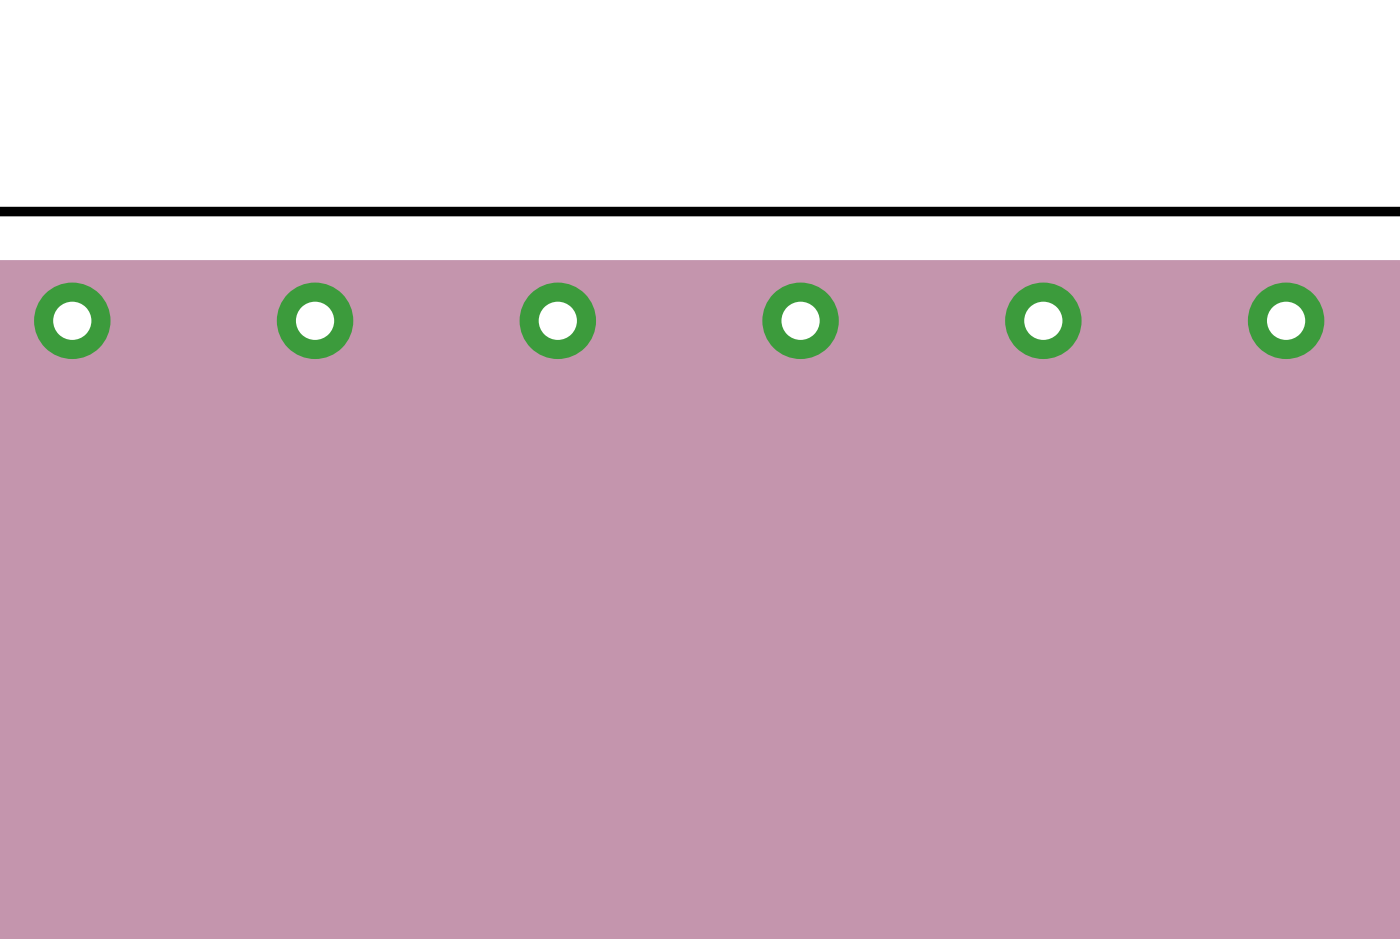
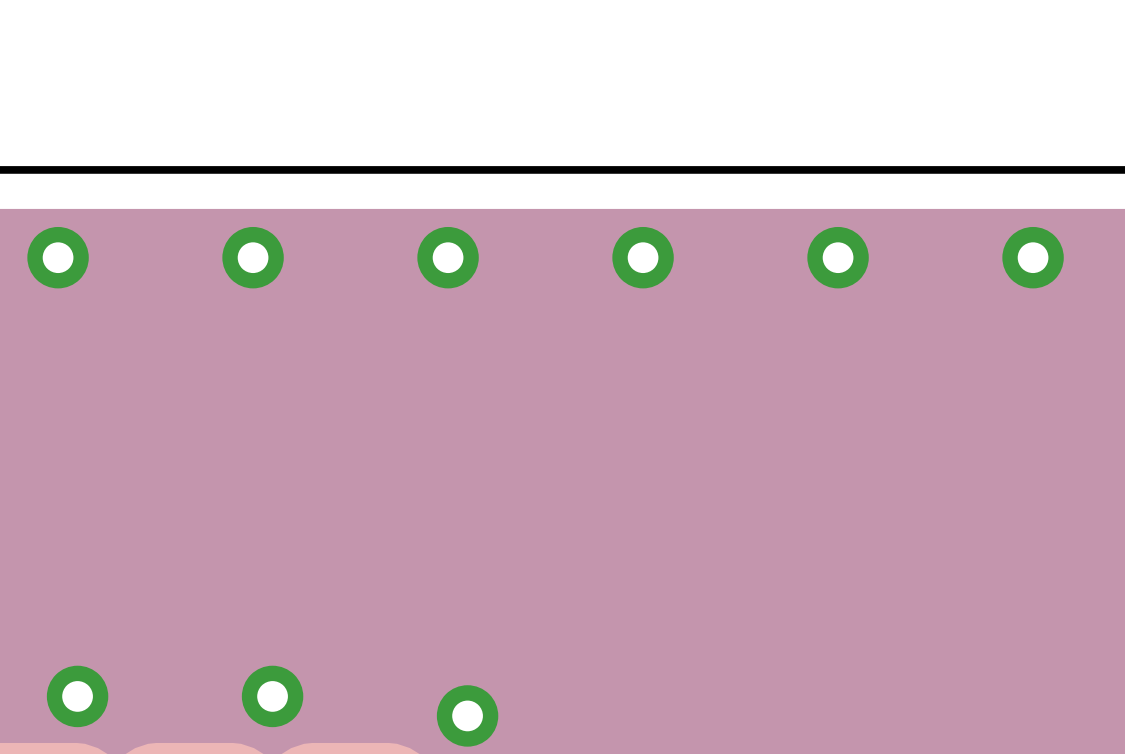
via: none -> (77, 696)
via: none -> (272, 696)
via: none -> (467, 715)

